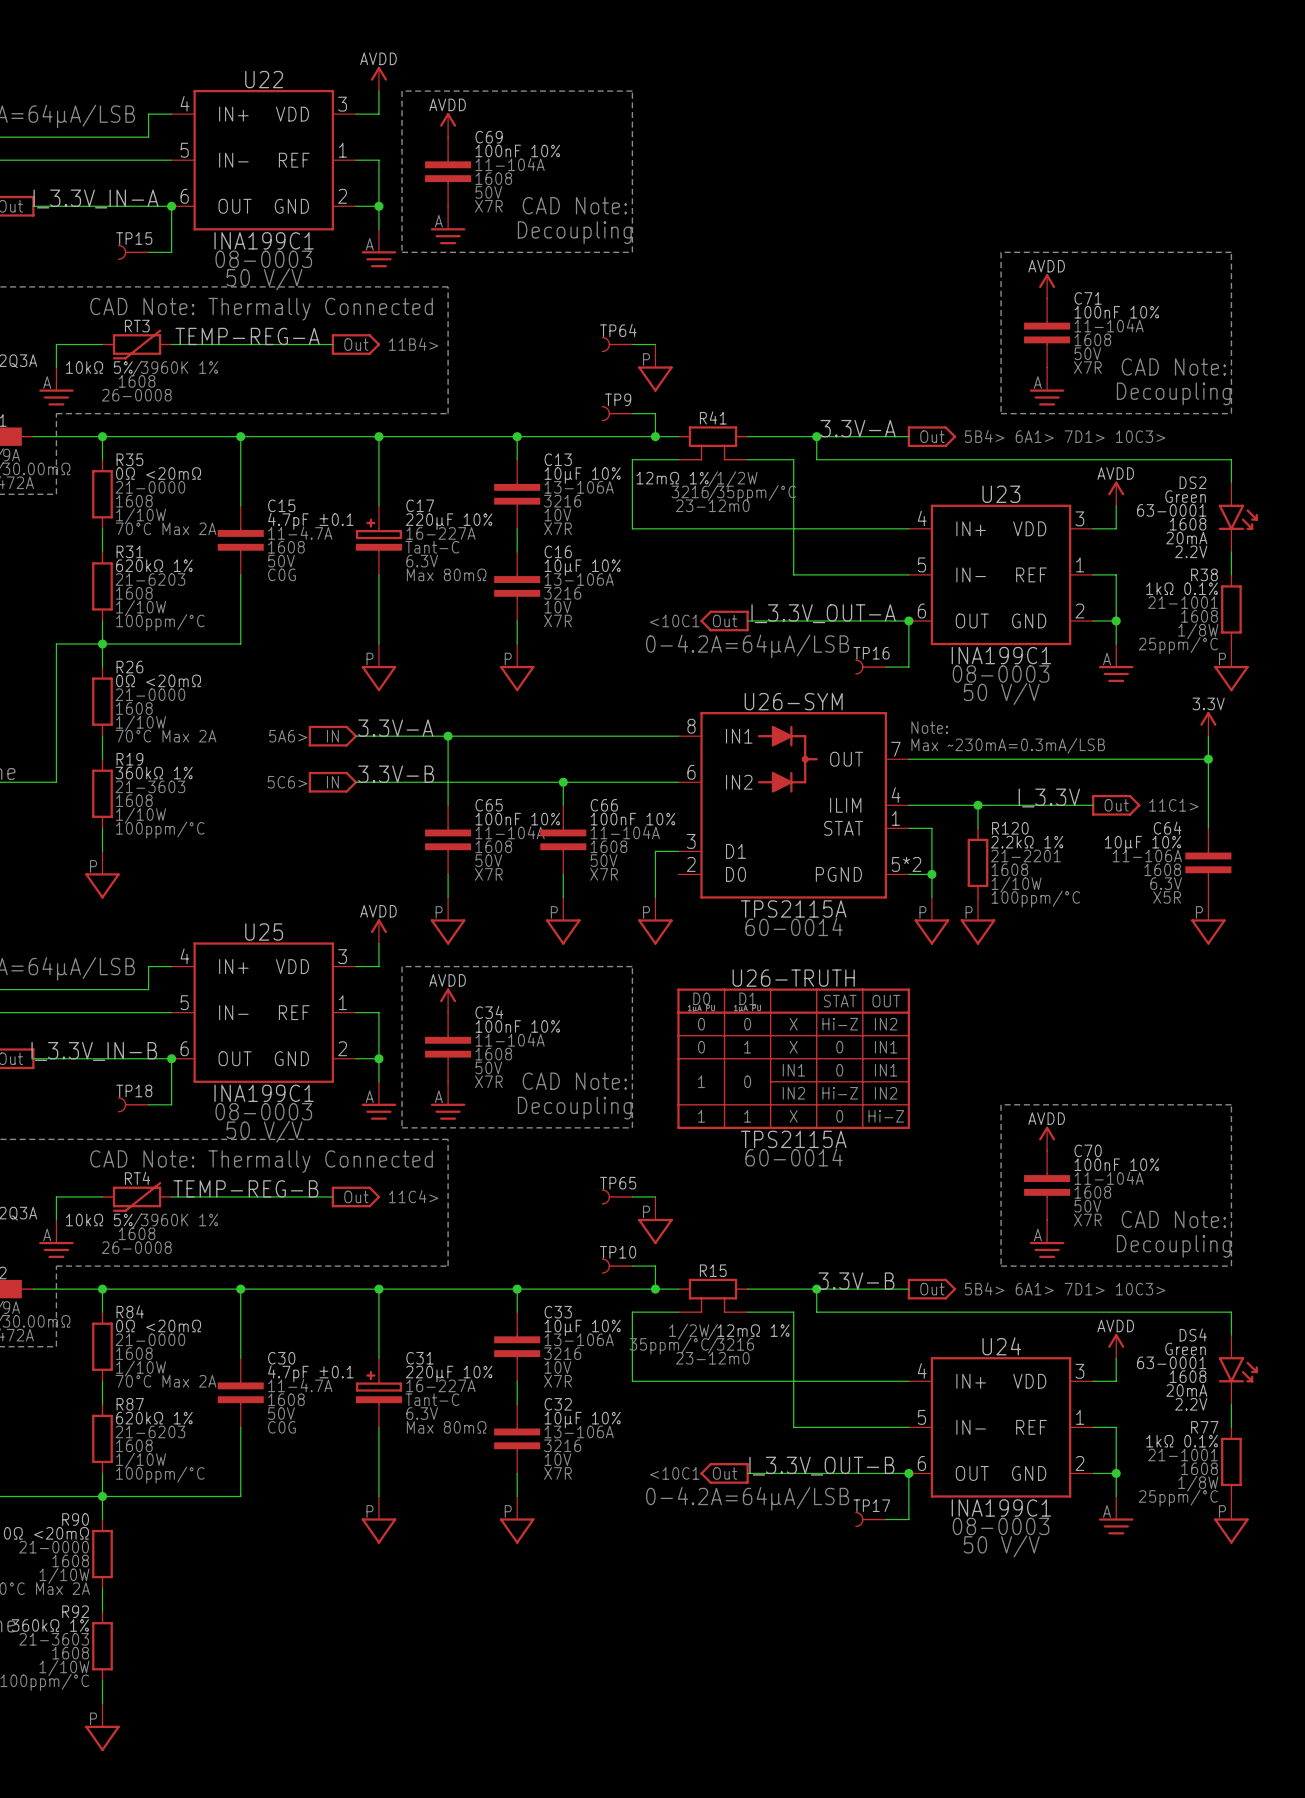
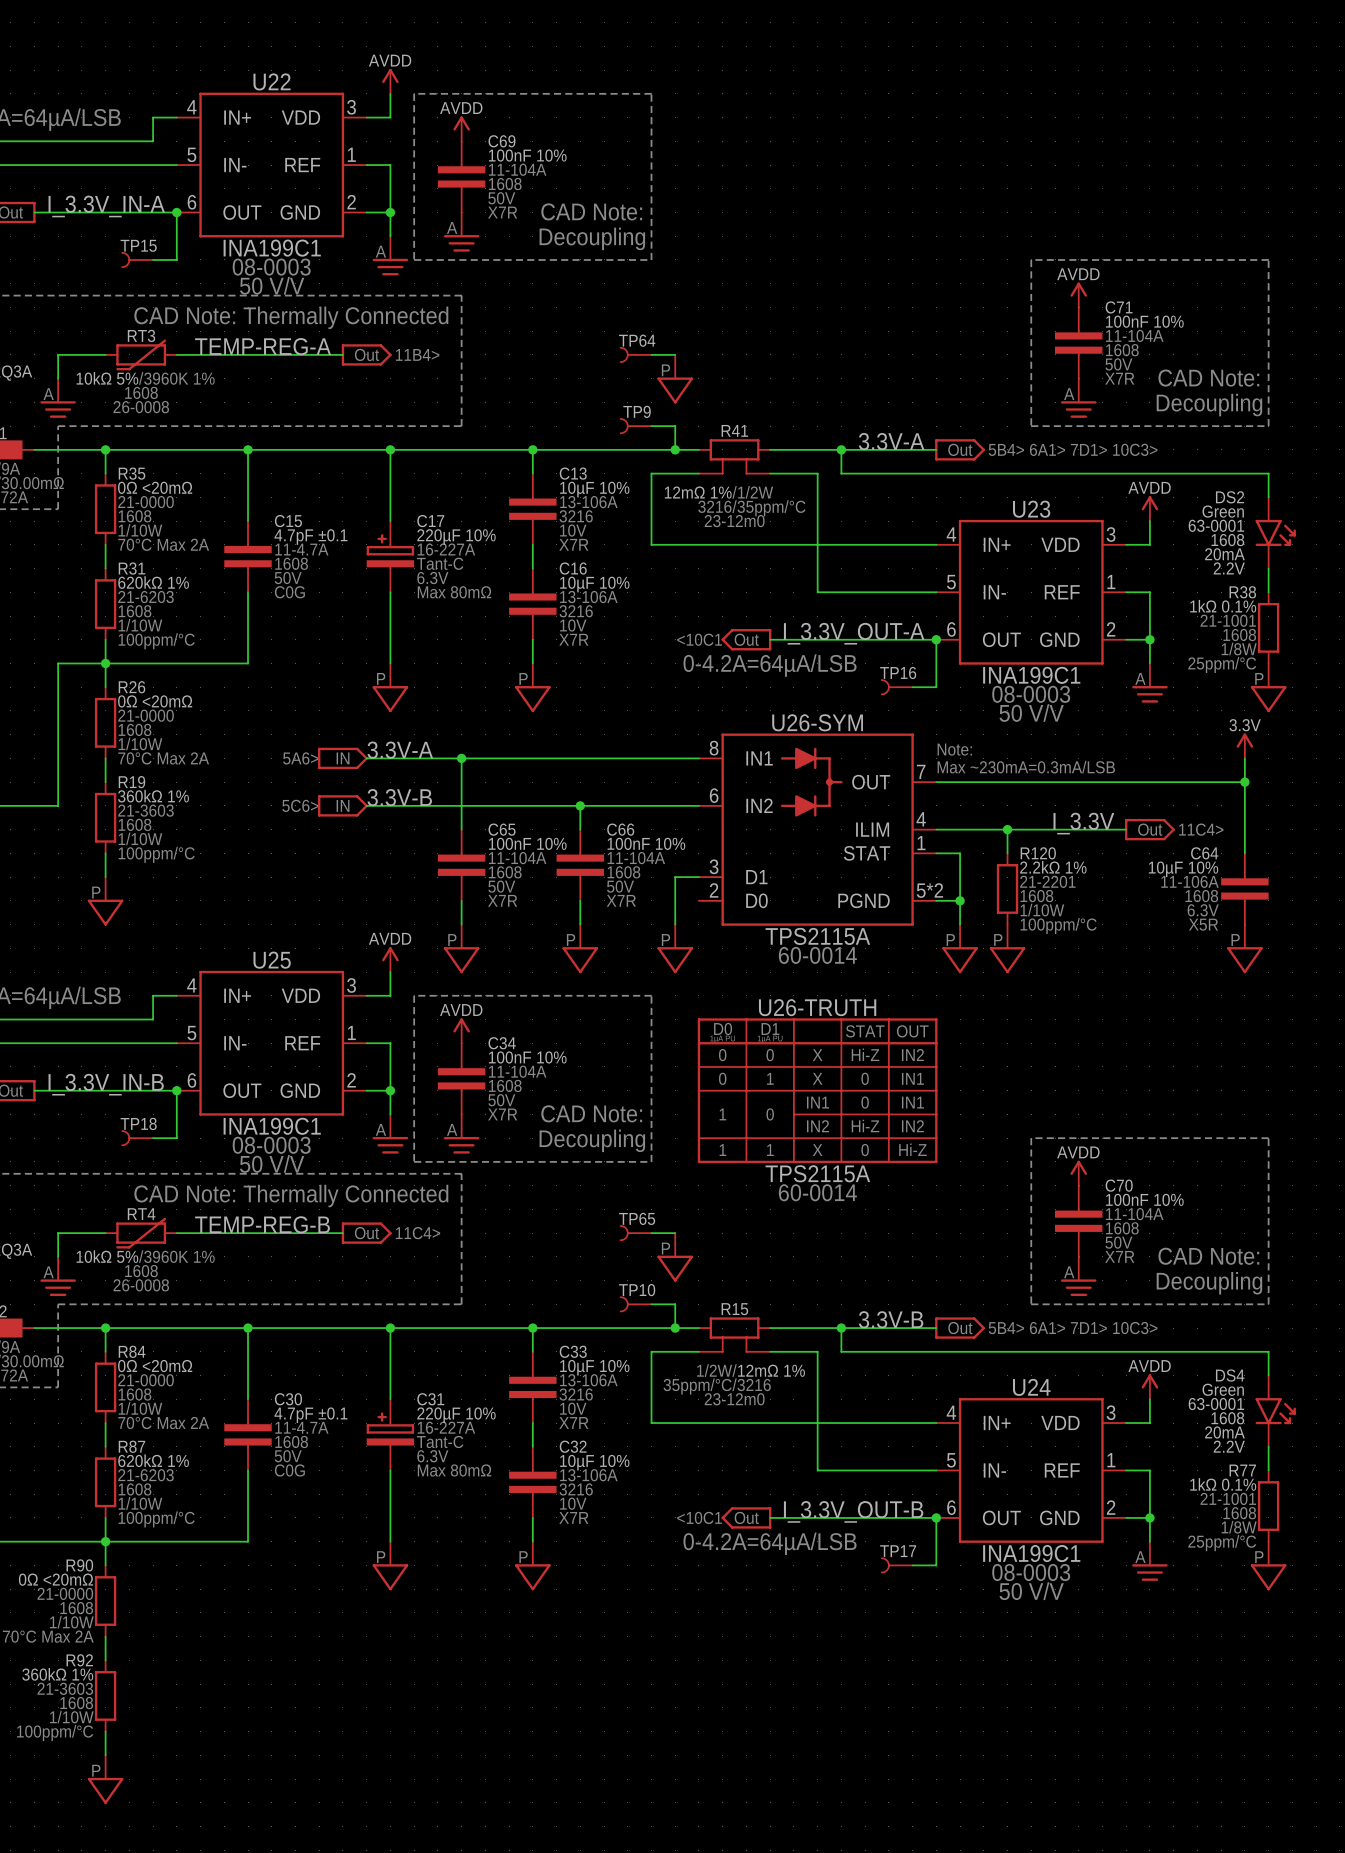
text: 11C1> (1173, 805) -> 11C4> (1201, 829)

